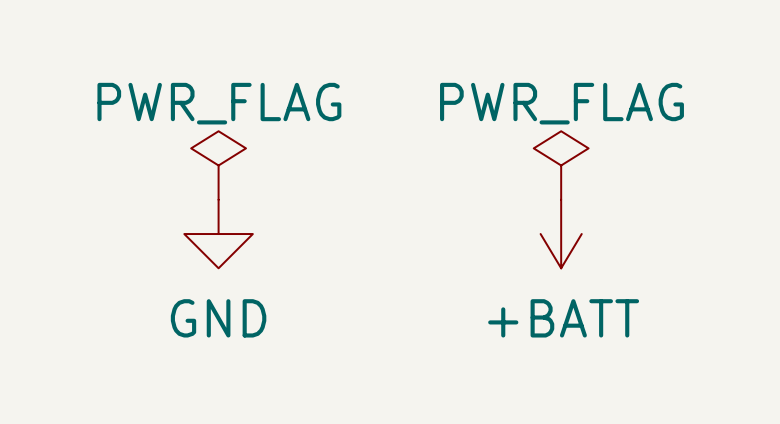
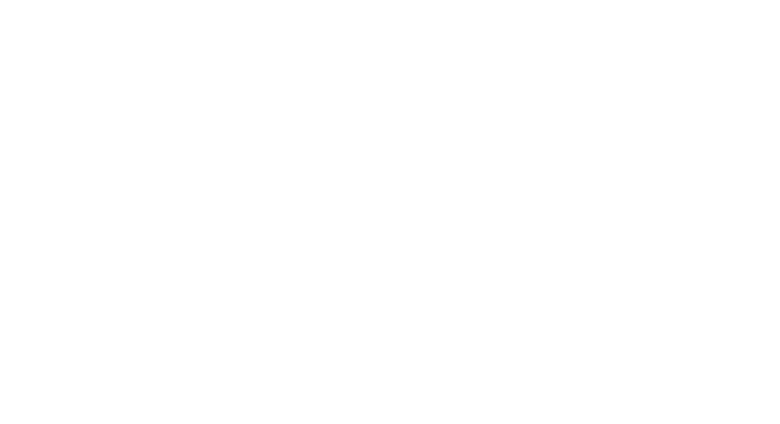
power symbol: PWR_FLAG (218, 165) -> none
power symbol: PWR_FLAG (561, 165) -> none
power symbol: GND (218, 234) -> none
power symbol: +BATT (561, 234) -> none

